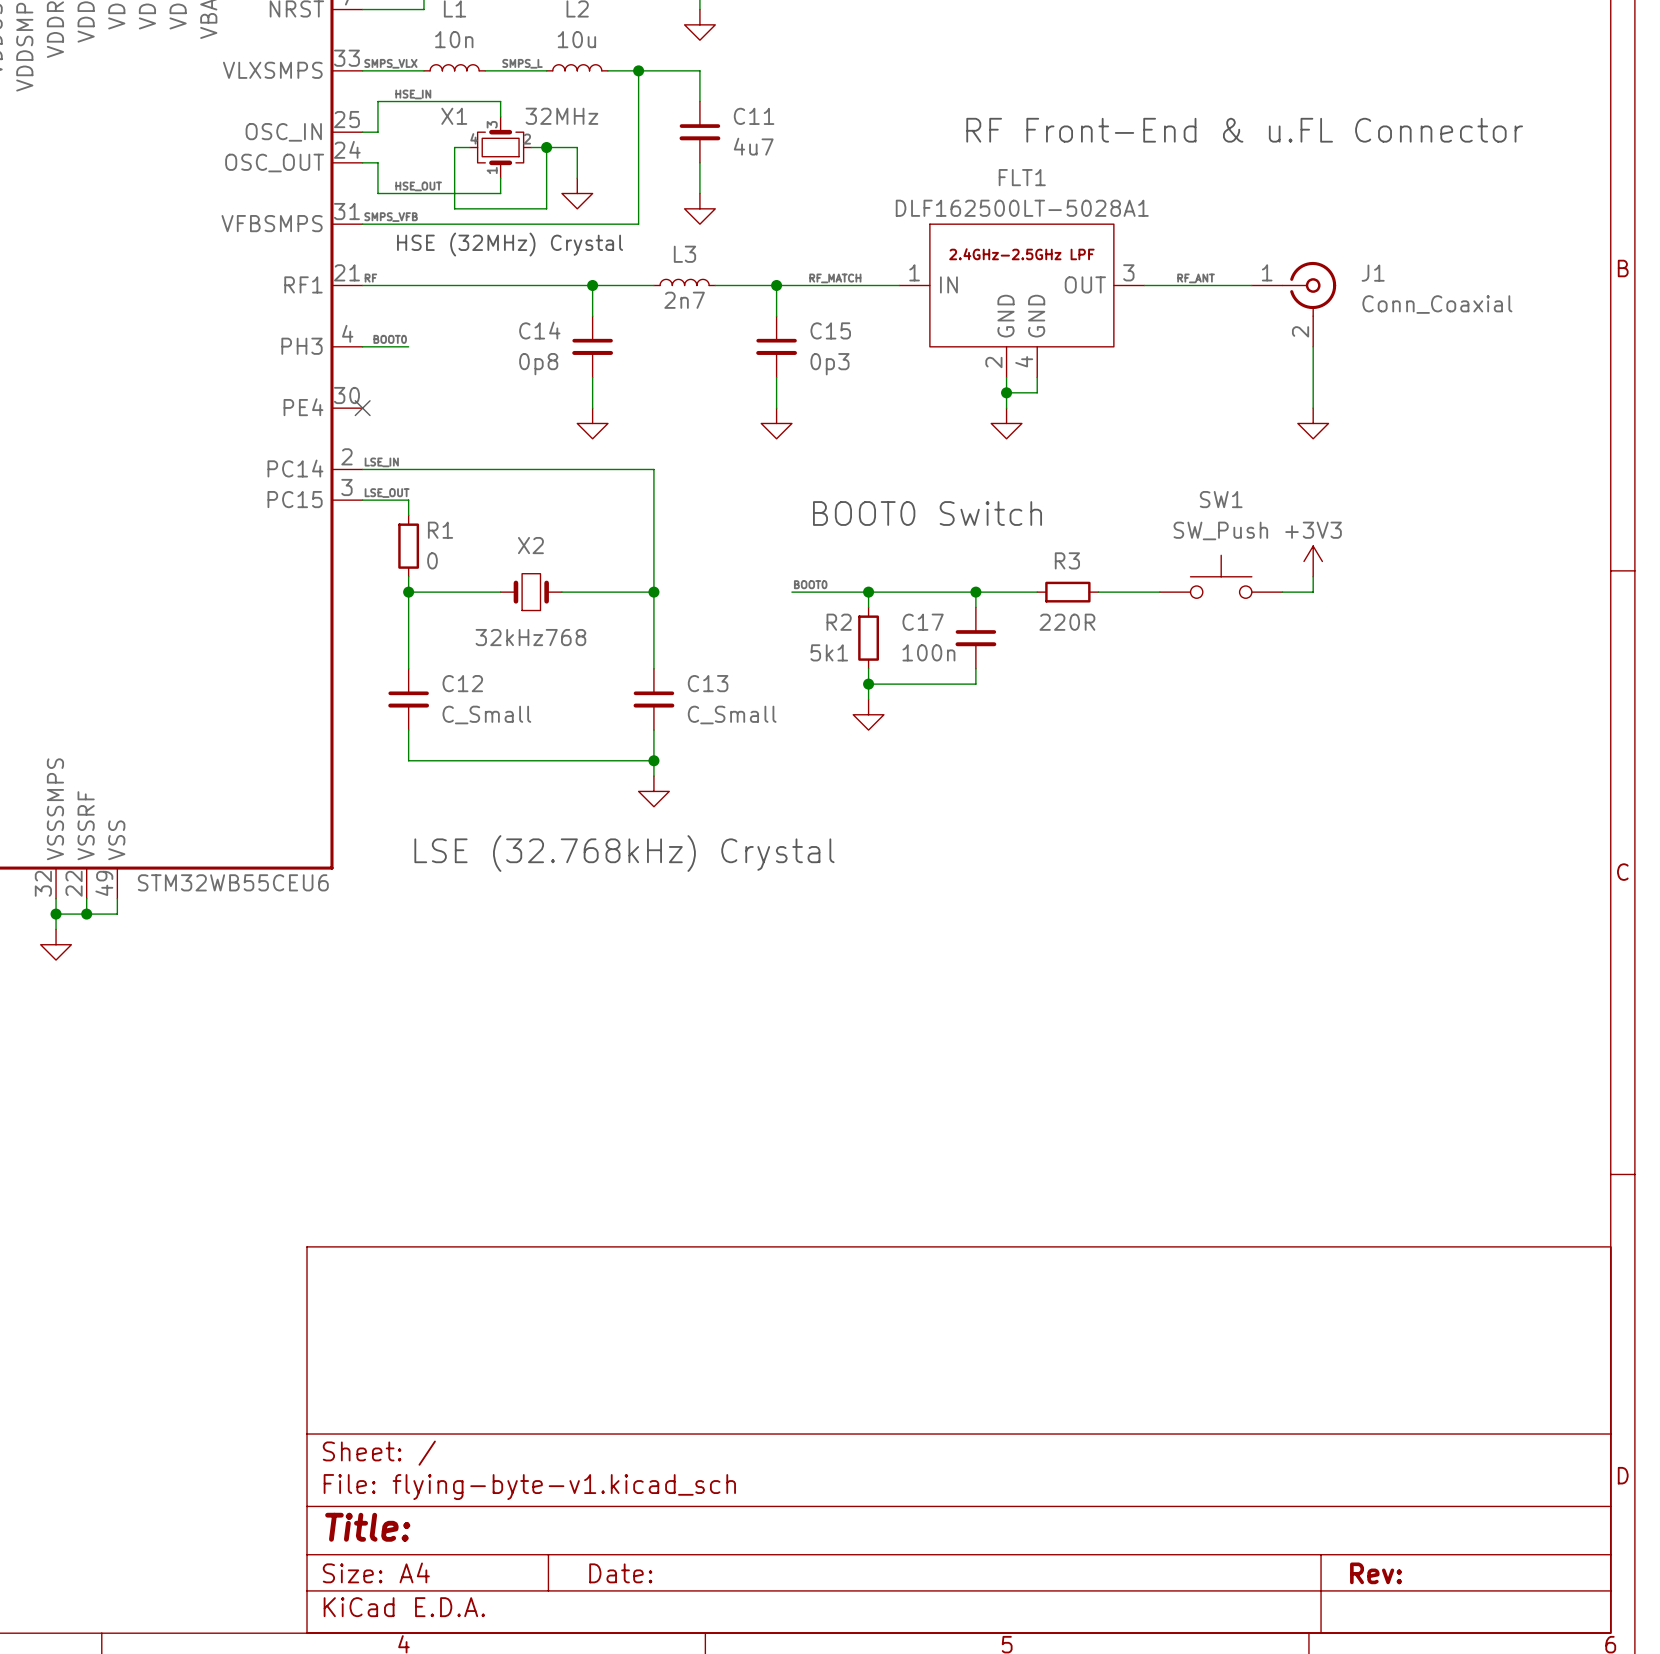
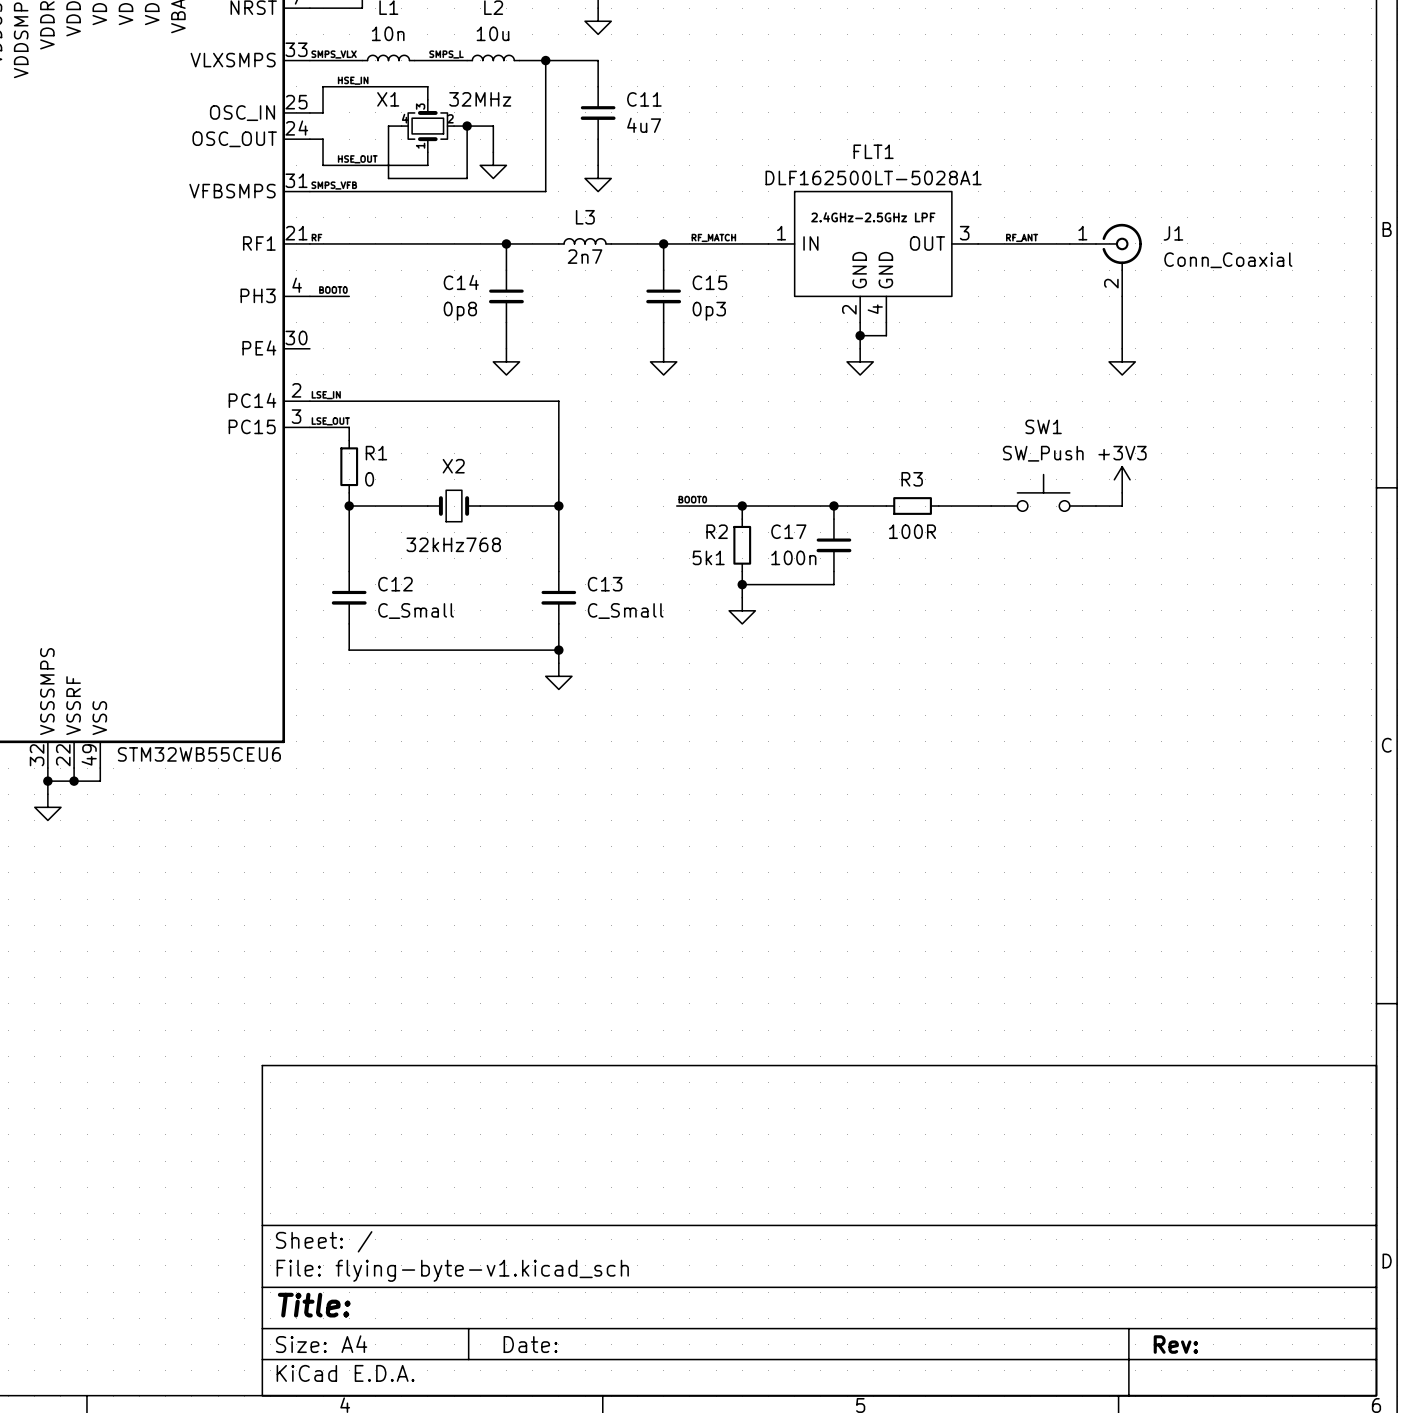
text: RF Front-End & u.FL Connector (1244, 130) -> none
text: HSE (32MHz) Crystal (510, 244) -> none
no-connect mark: (362, 408) -> none
text: BOOT0 Switch (927, 513) -> none
R3 value: 220R (1067, 622) -> 100R (912, 531)
text: LSE (32.768kHz) Crystal (624, 853) -> none

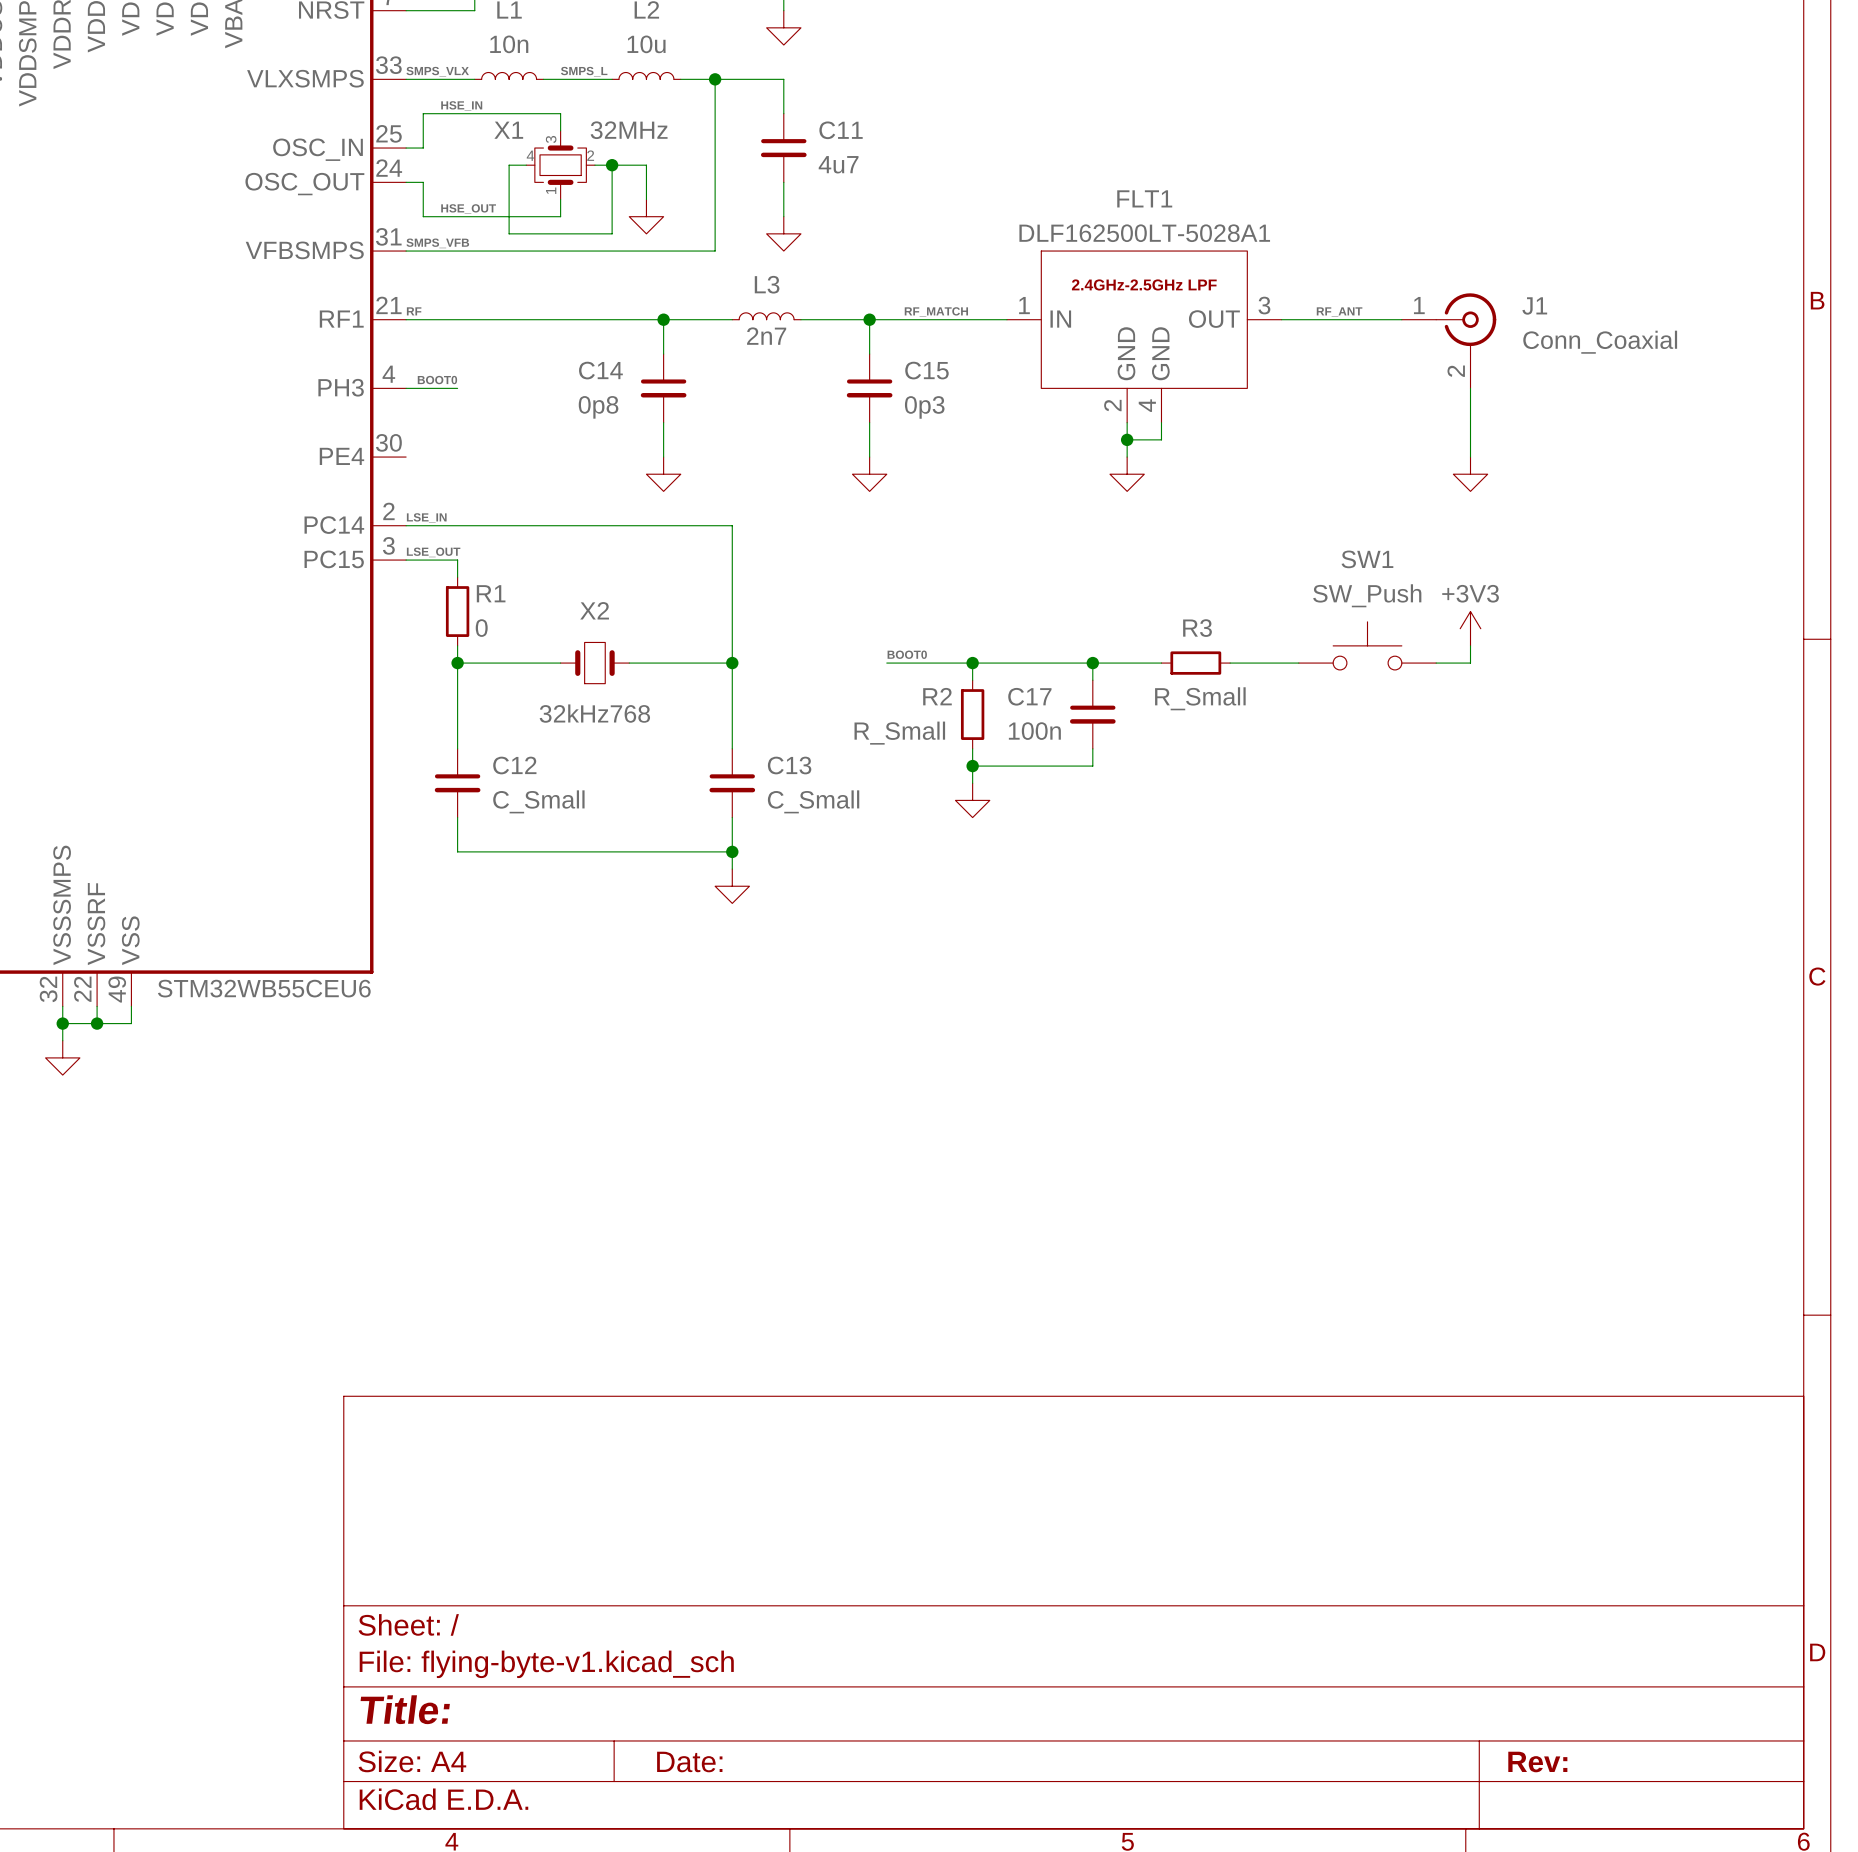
R3 value: 100R (912, 531) -> R_Small (1200, 698)
R2 value: 5k1 (708, 557) -> R_Small (899, 733)

